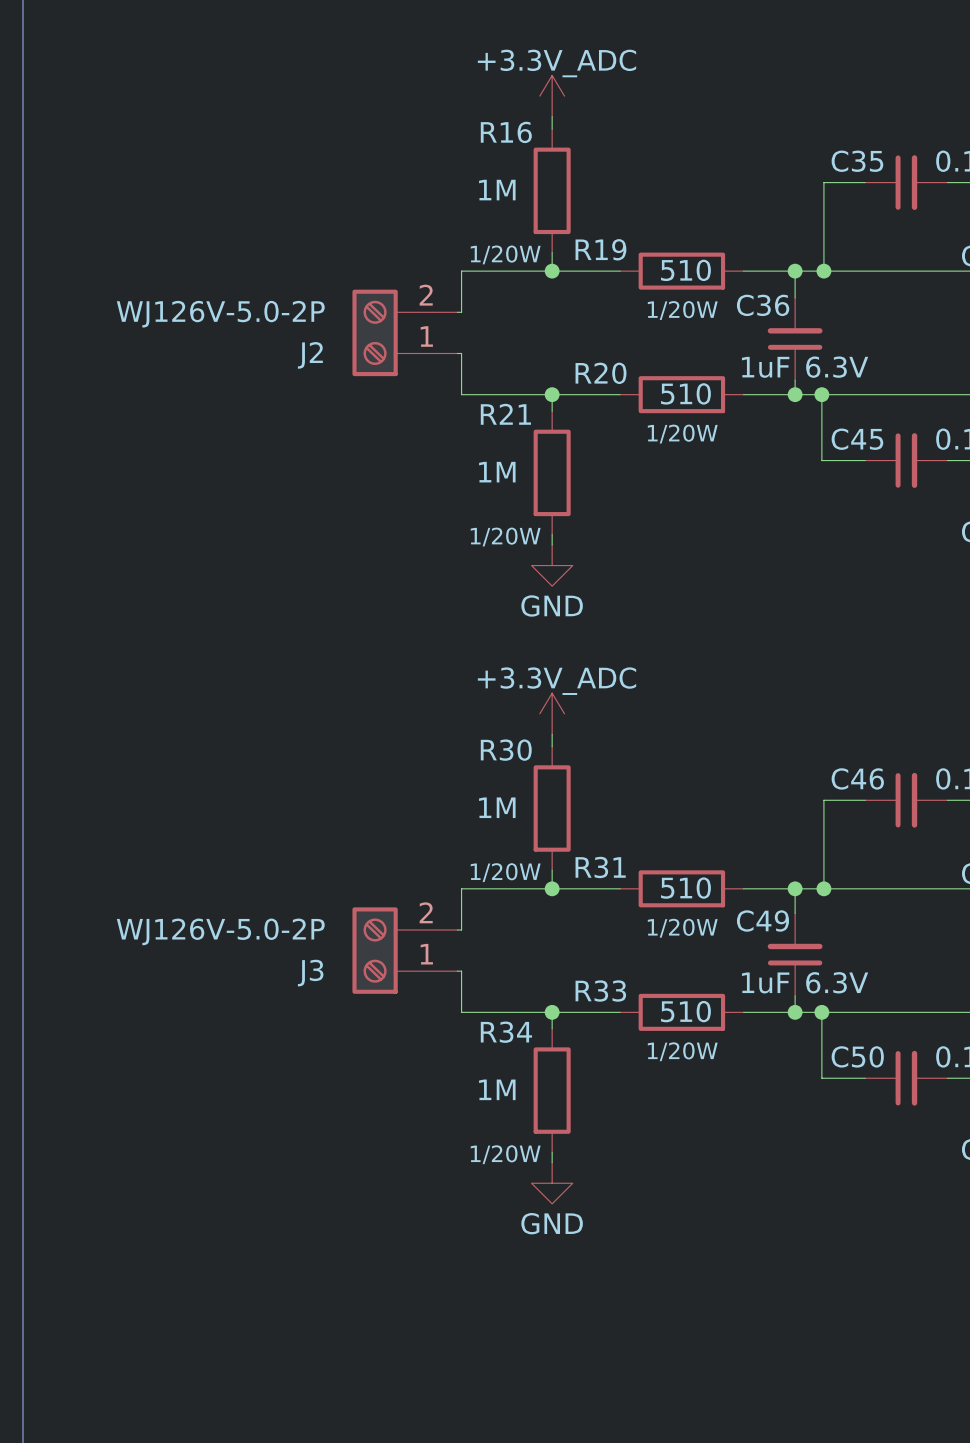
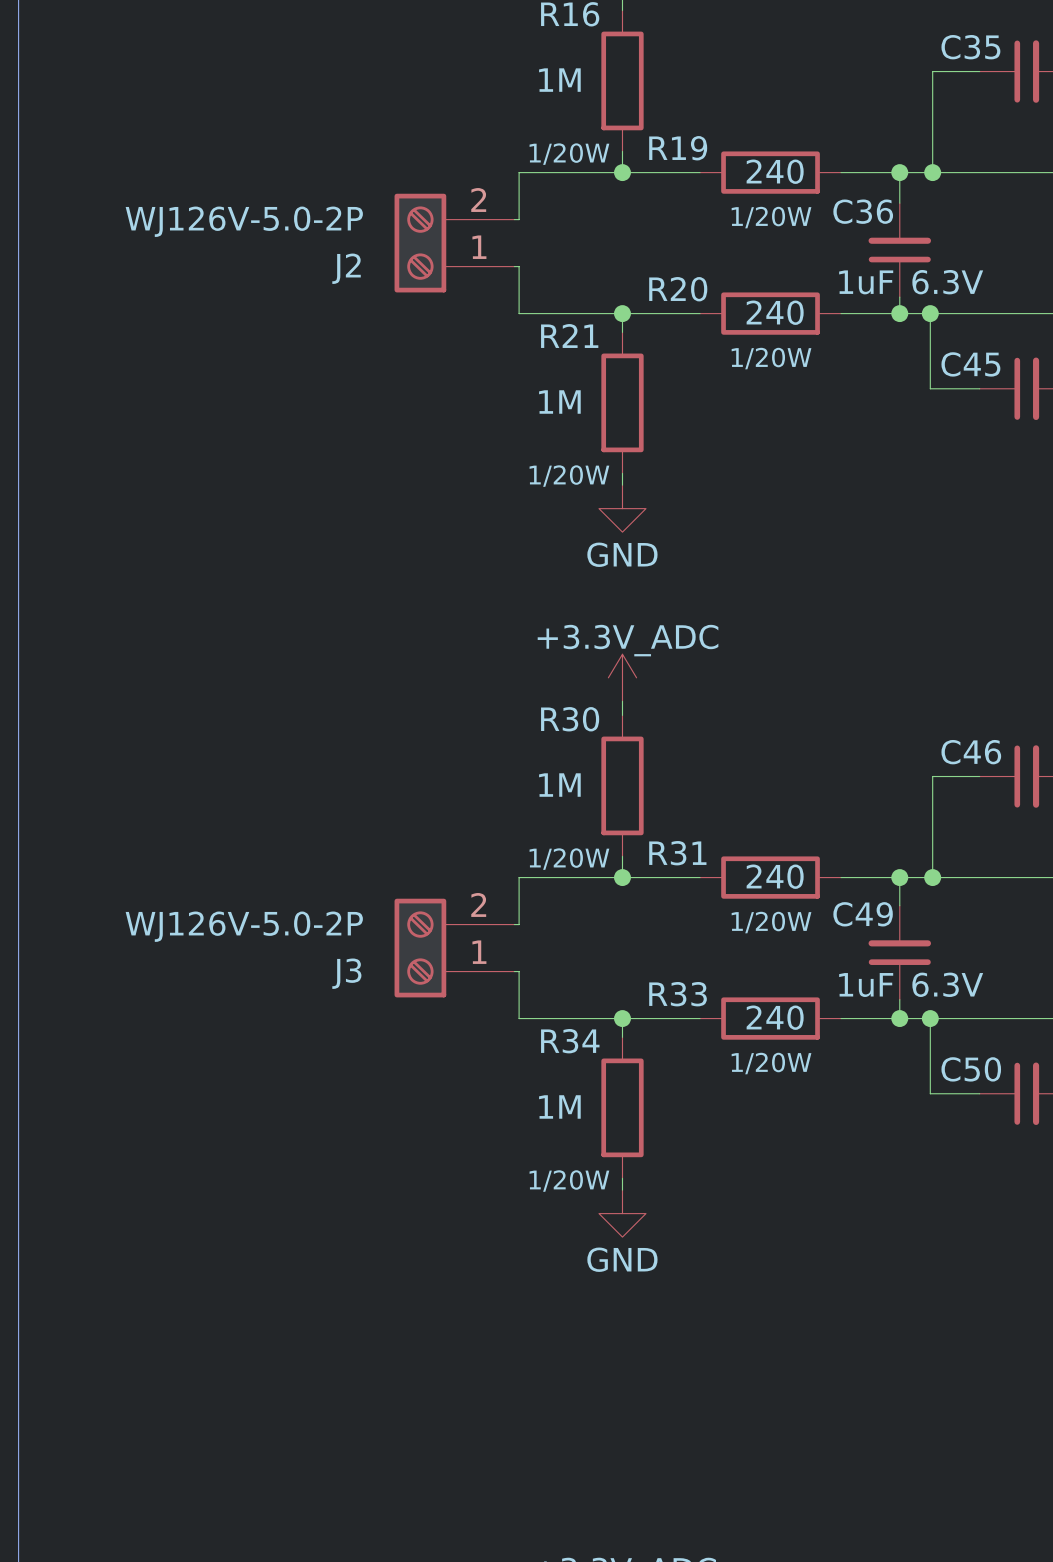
R19 value: 510 (685, 270) -> 240 (775, 171)
R20 value: 510 (685, 393) -> 240 (775, 312)
R31 value: 510 (685, 888) -> 240 (775, 876)
R33 value: 510 (685, 1011) -> 240 (775, 1017)

